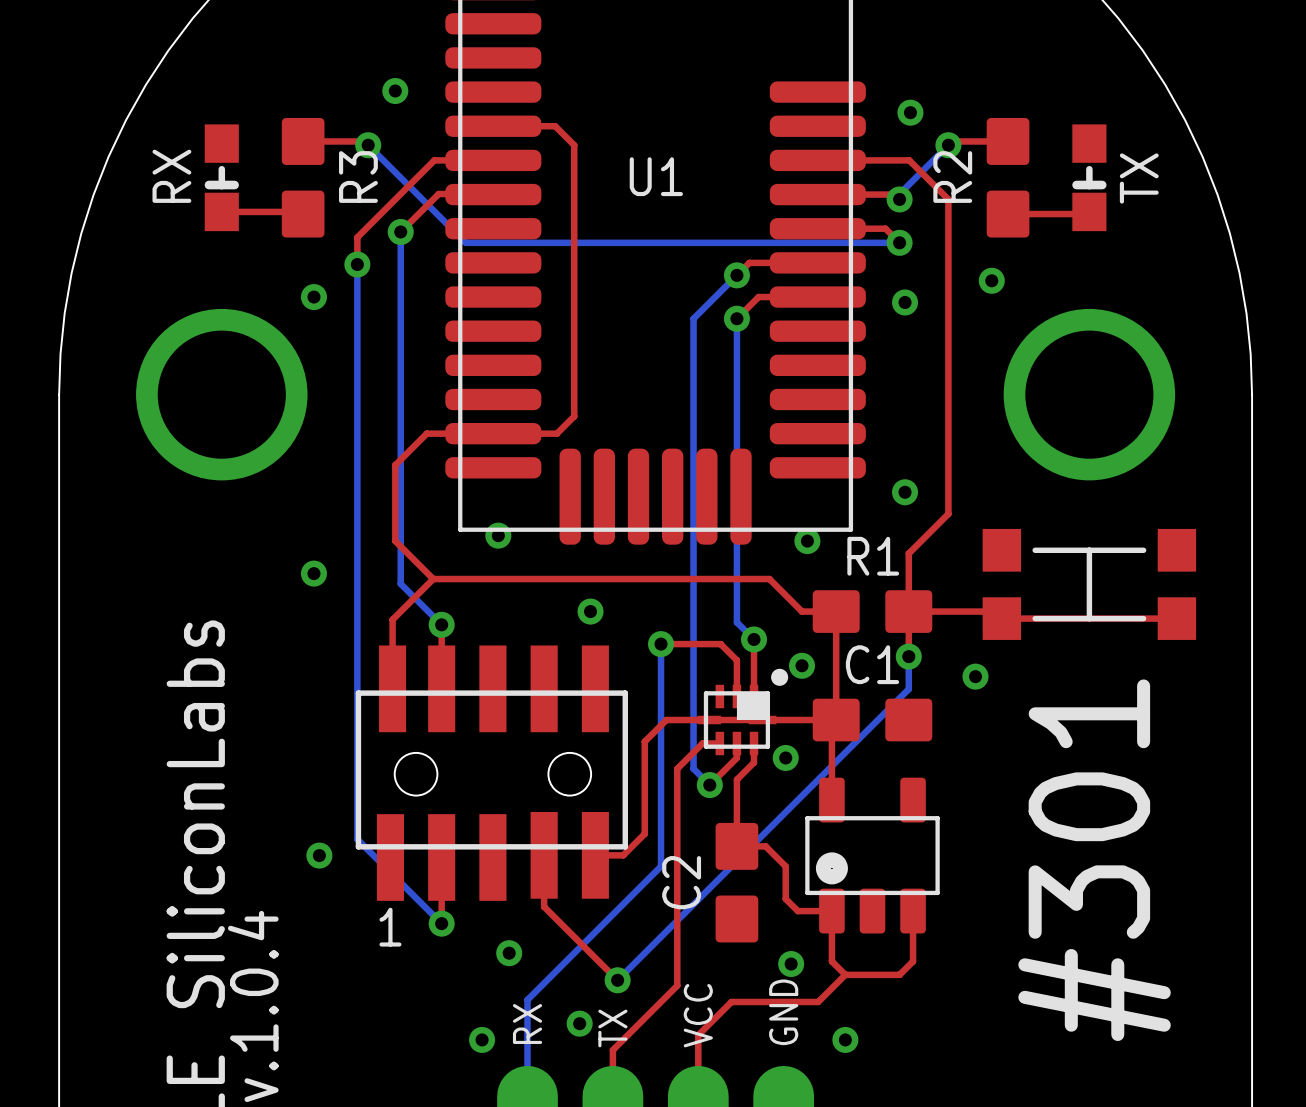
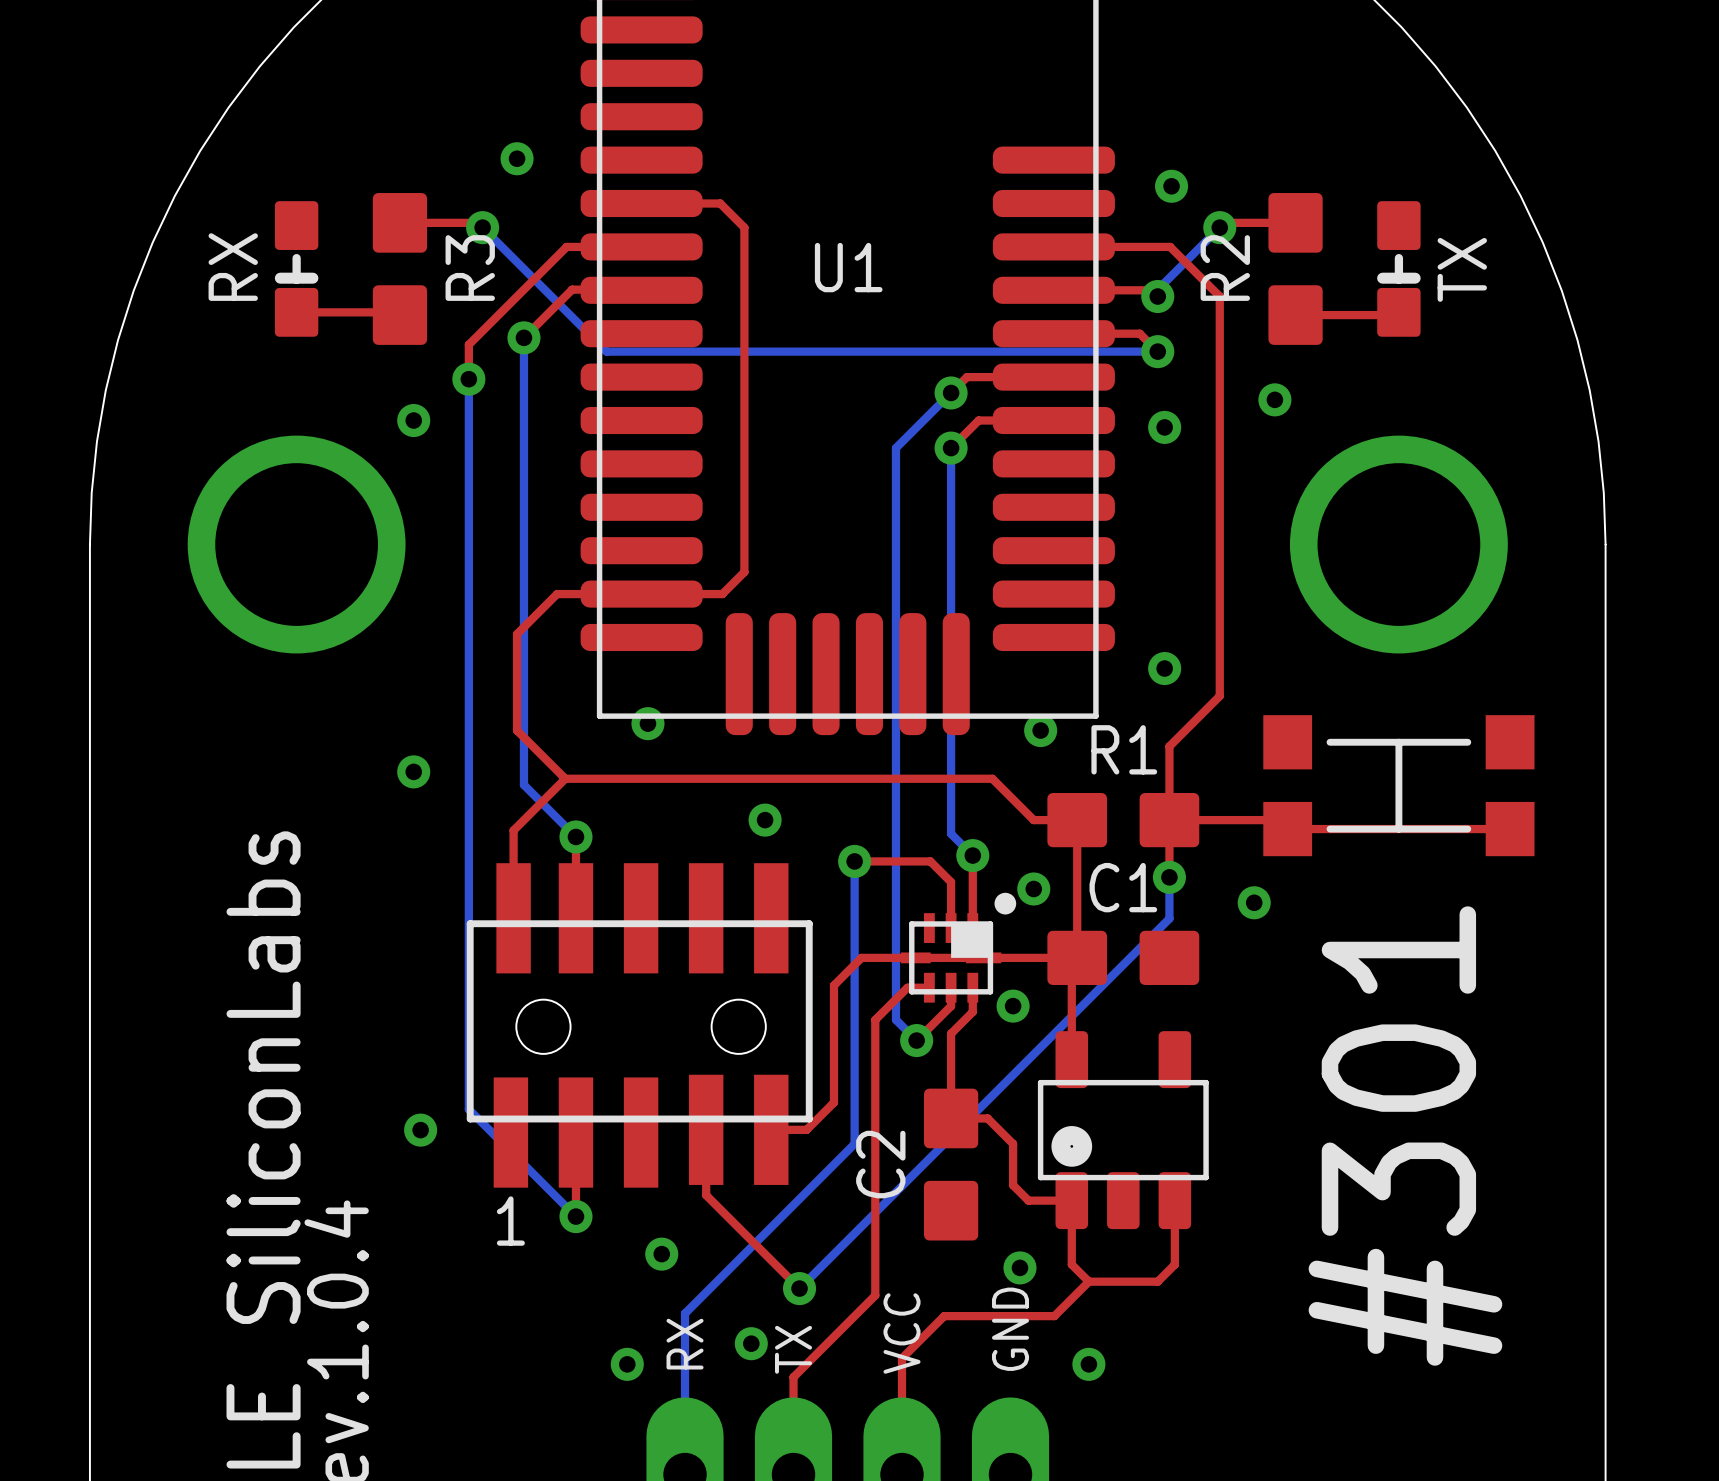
part footprint: [204, 124, 239, 232] -> [274, 201, 319, 337]
part footprint: [1072, 124, 1107, 232] -> [1377, 201, 1421, 337]

